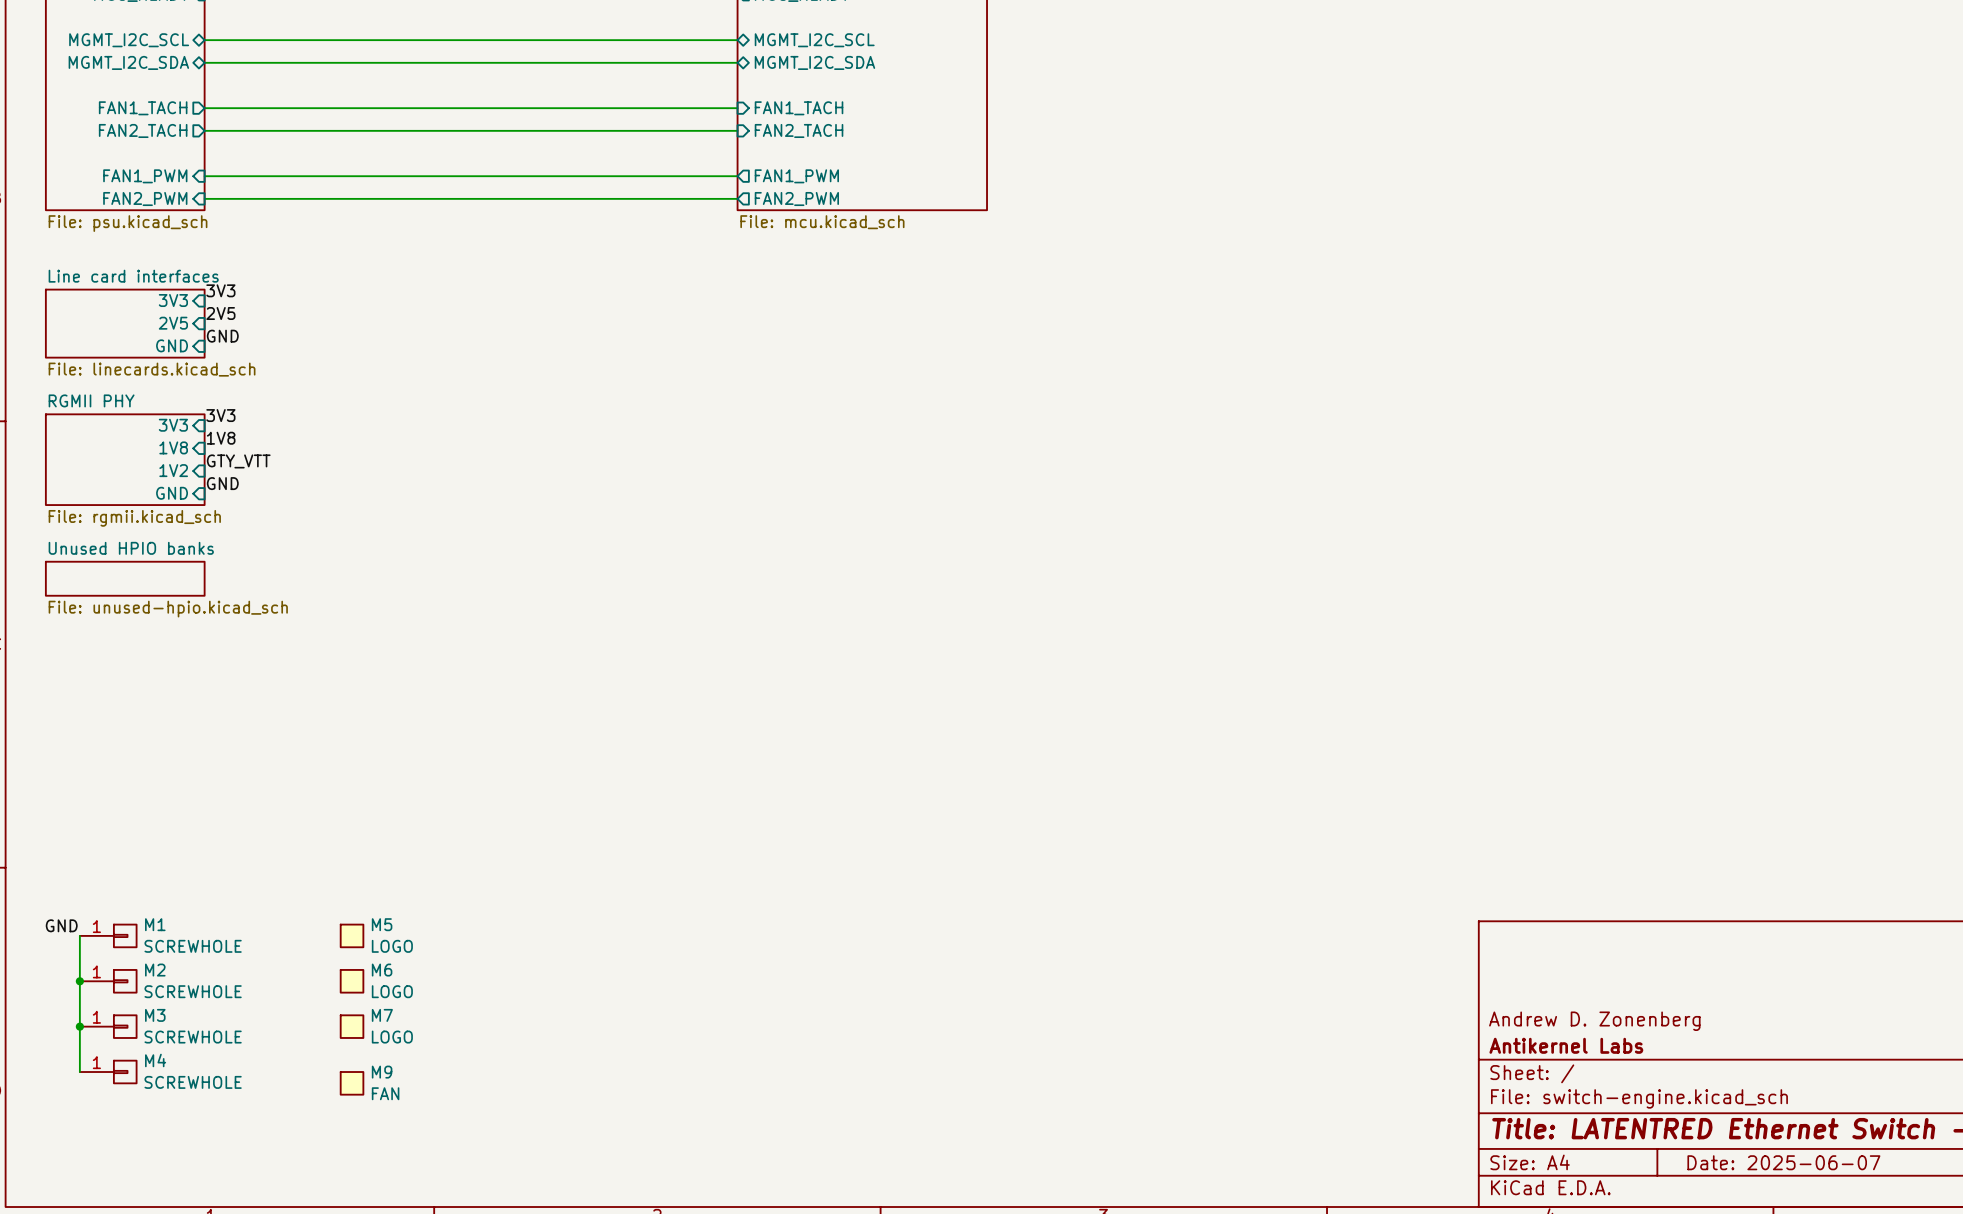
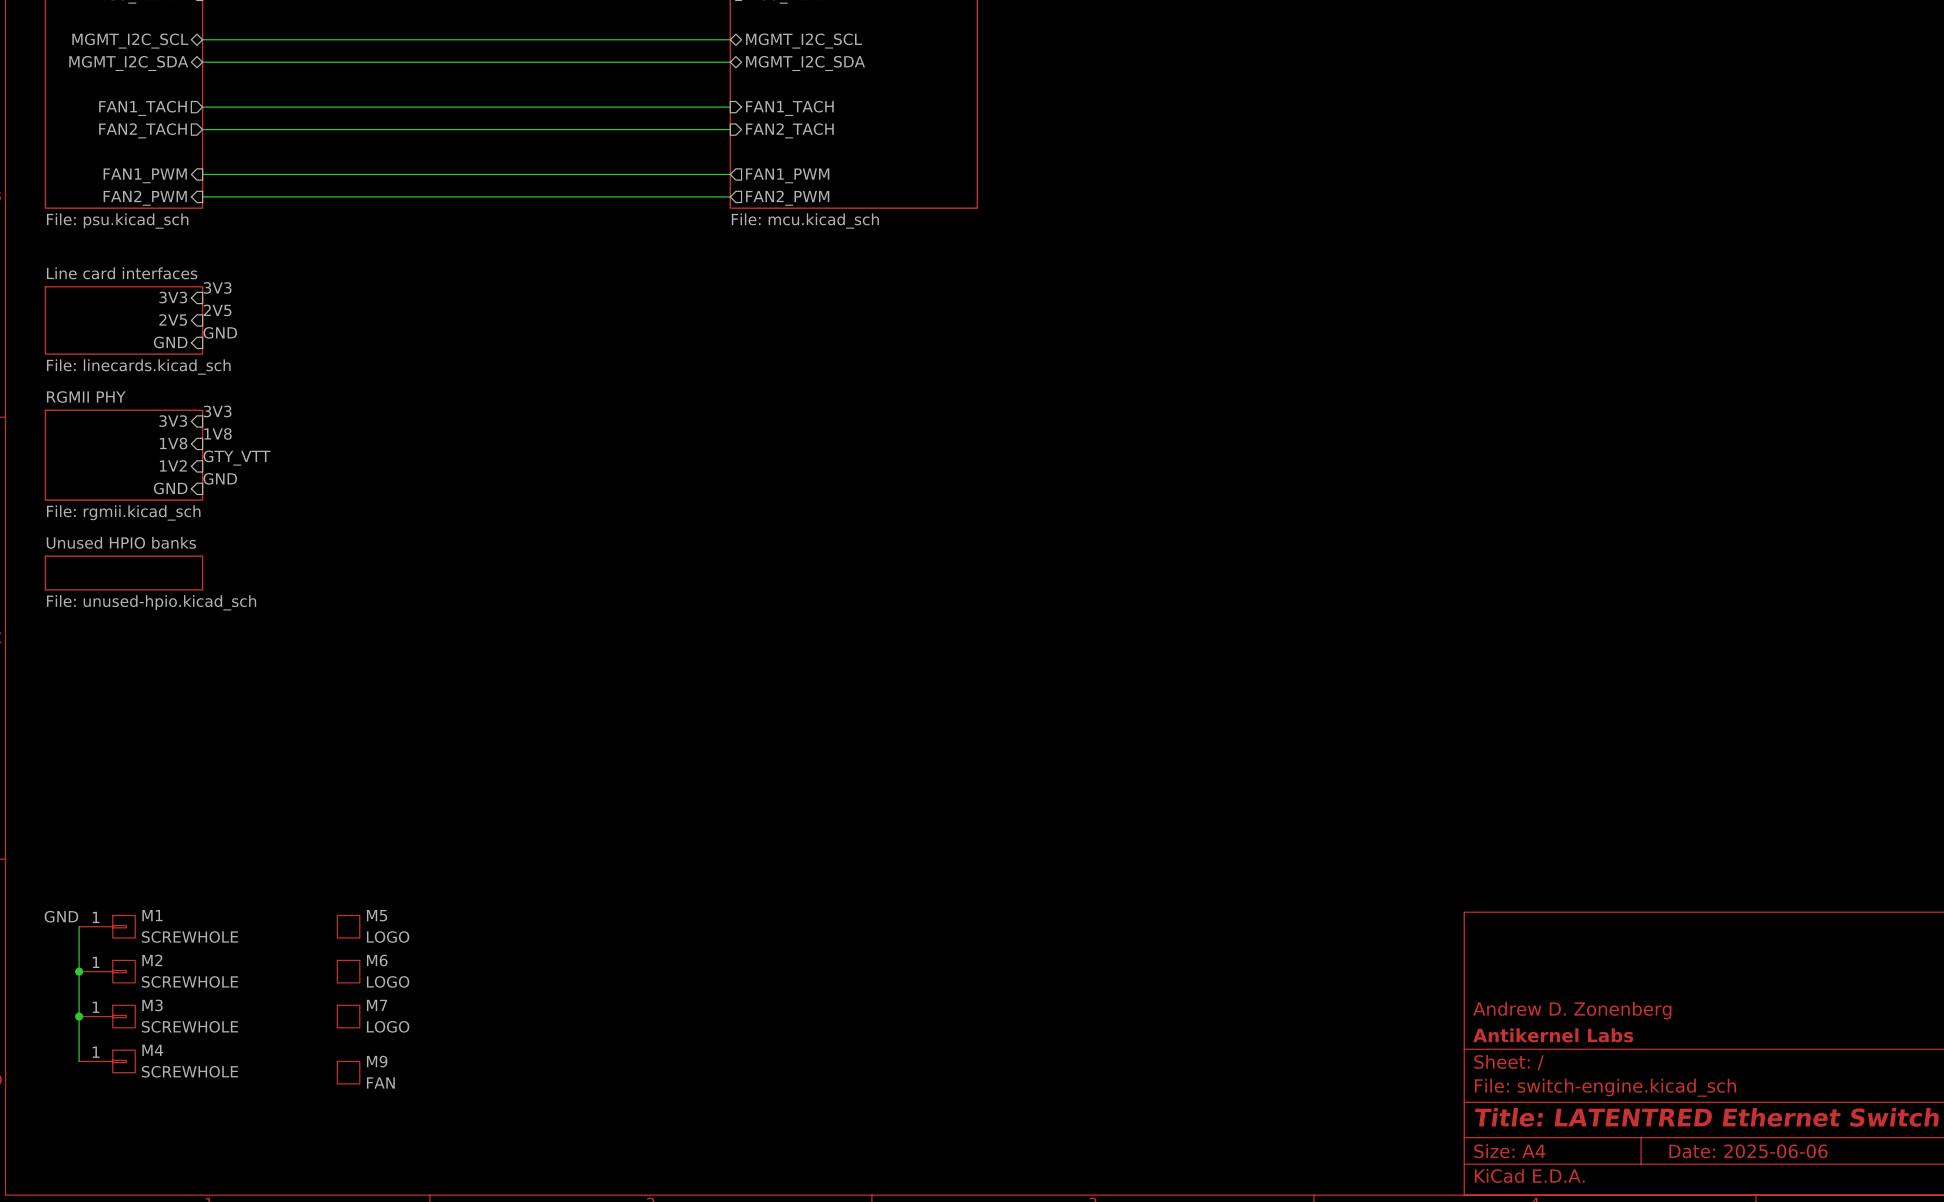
title block: Date: 2025-06-07 (1783, 1162) -> Date: 2025-06-06 (1748, 1151)

